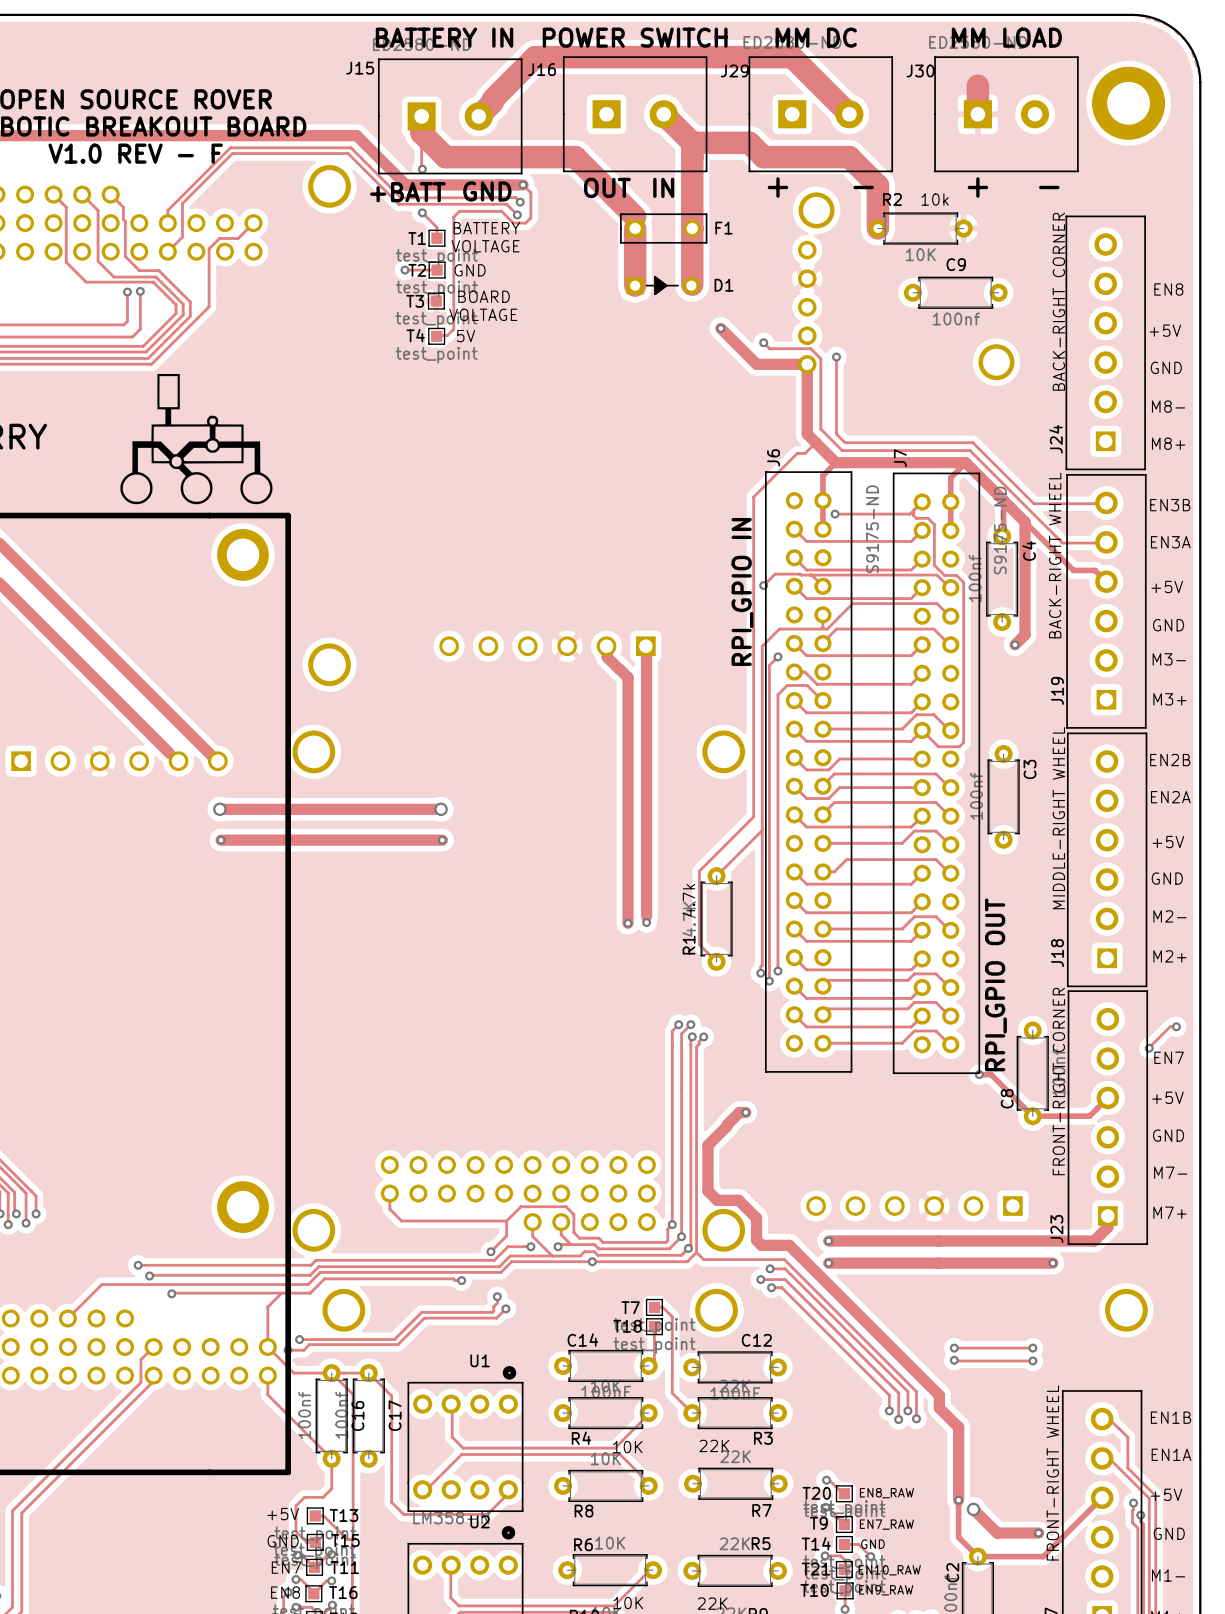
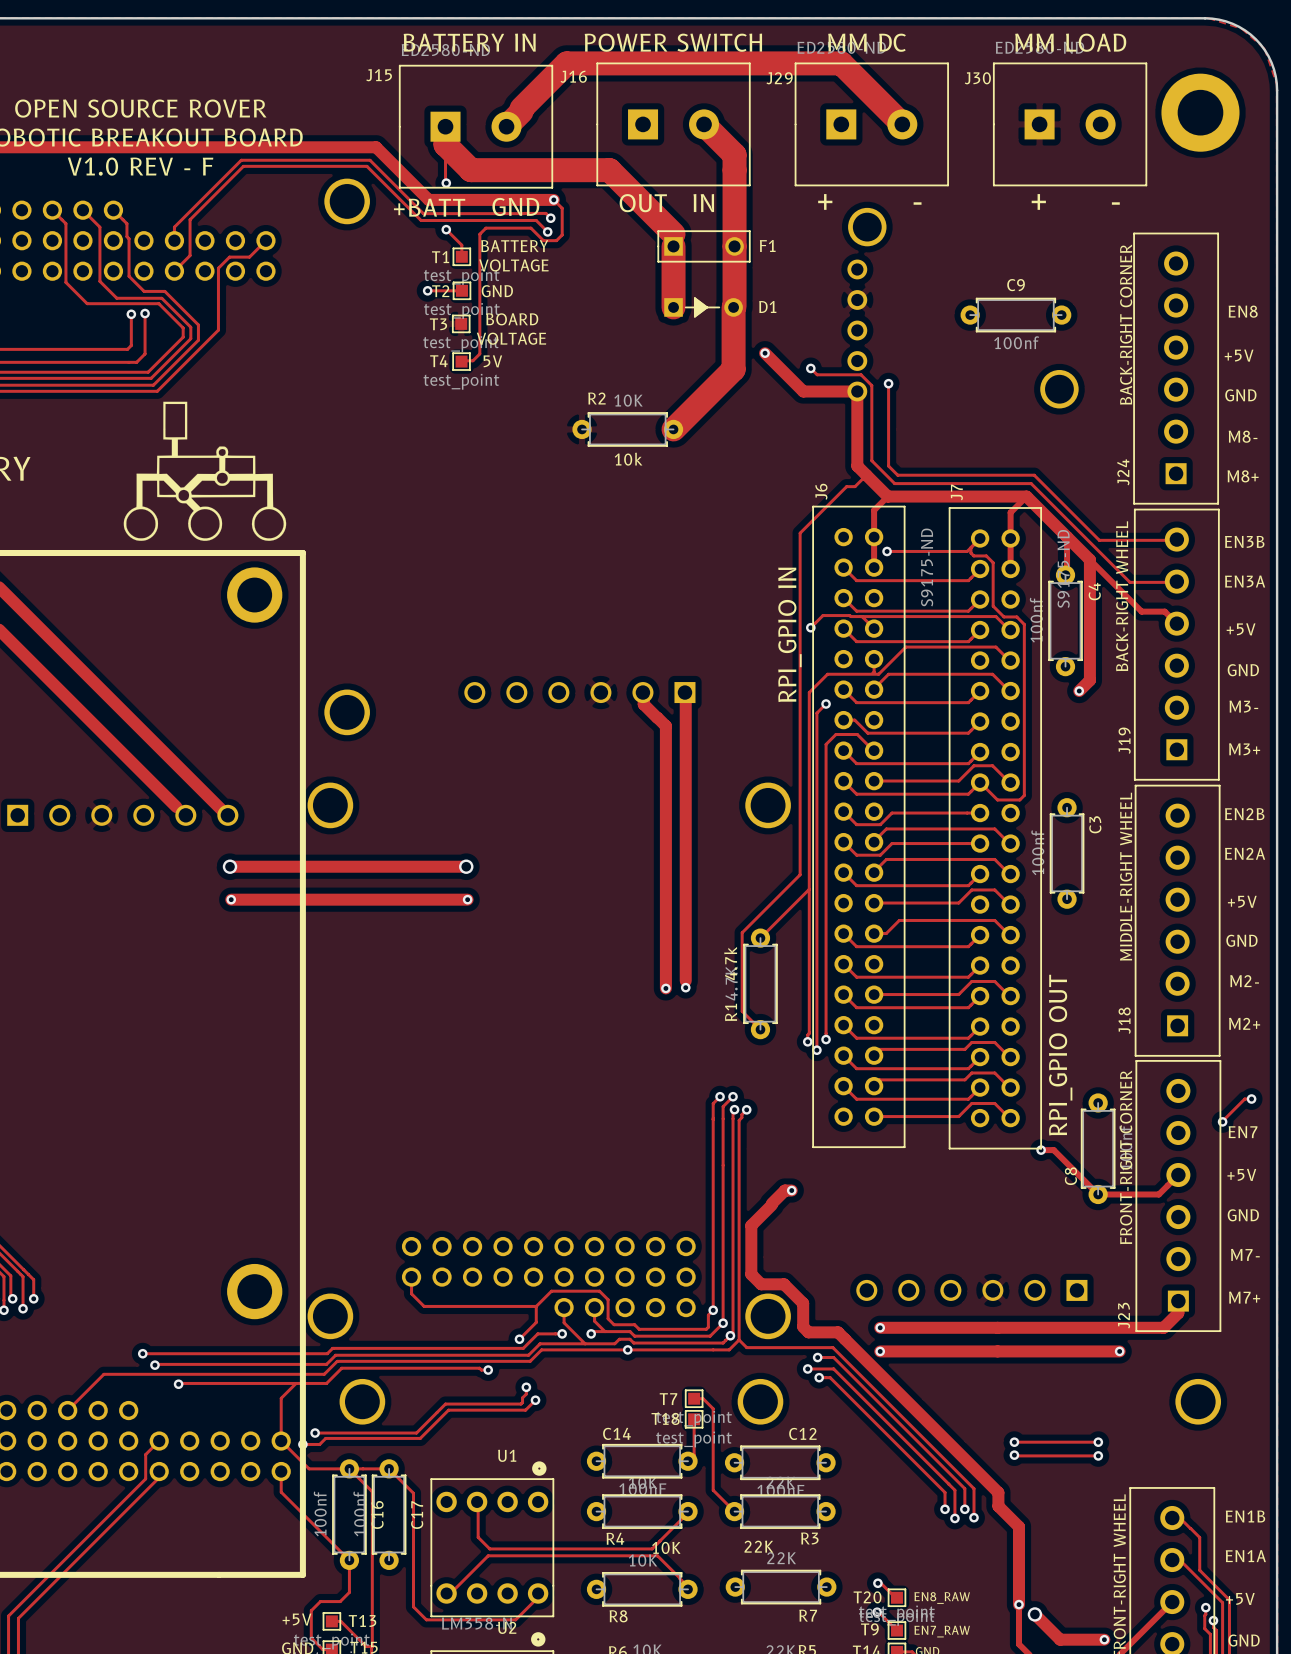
track: (977, 85) (977, 114) -> none
track: (692, 142) (749, 142) (763, 157) (849, 157) (877, 185) (877, 228) -> none
text: 10k (935, 199) -> none
R2 position: (920, 228) -> (627, 429)
R2 value position: 10K (920, 254) -> 10K (628, 400)
track: none -> (733, 307) (733, 369) (673, 429)
text: none -> 10k (628, 459)

